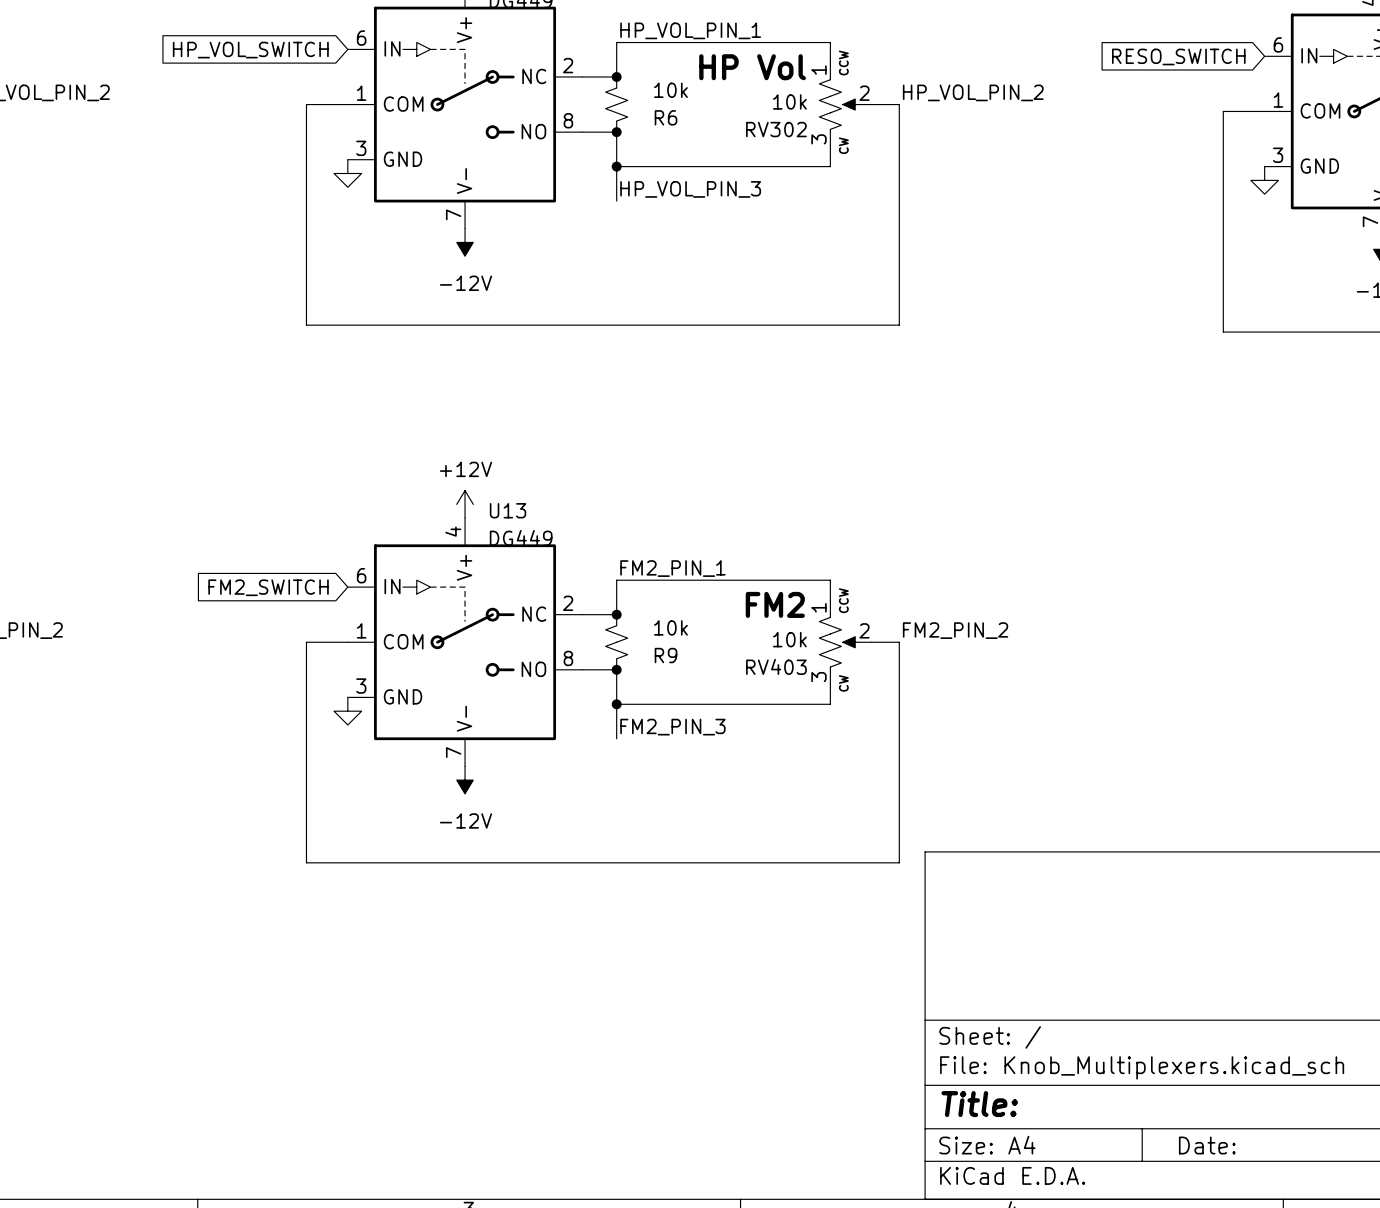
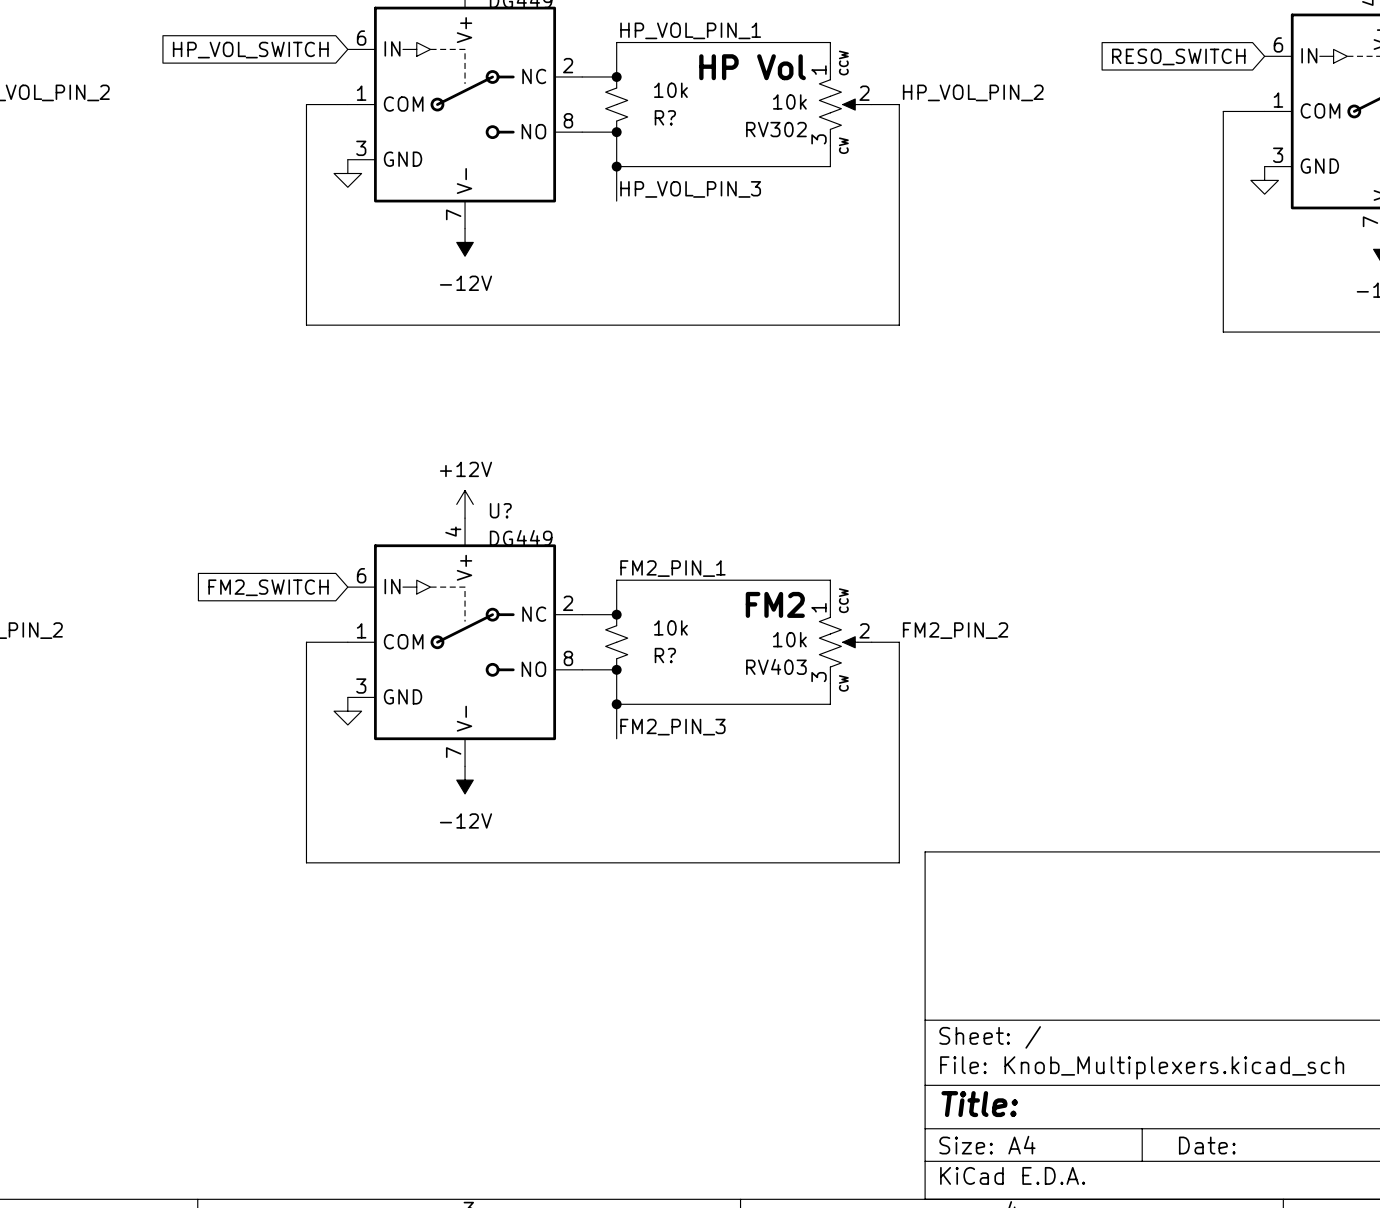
R6 name: R6 (666, 117) -> R? (665, 117)
U13 name: U13 (508, 510) -> U? (500, 510)
R9 name: R9 (666, 655) -> R? (665, 655)

